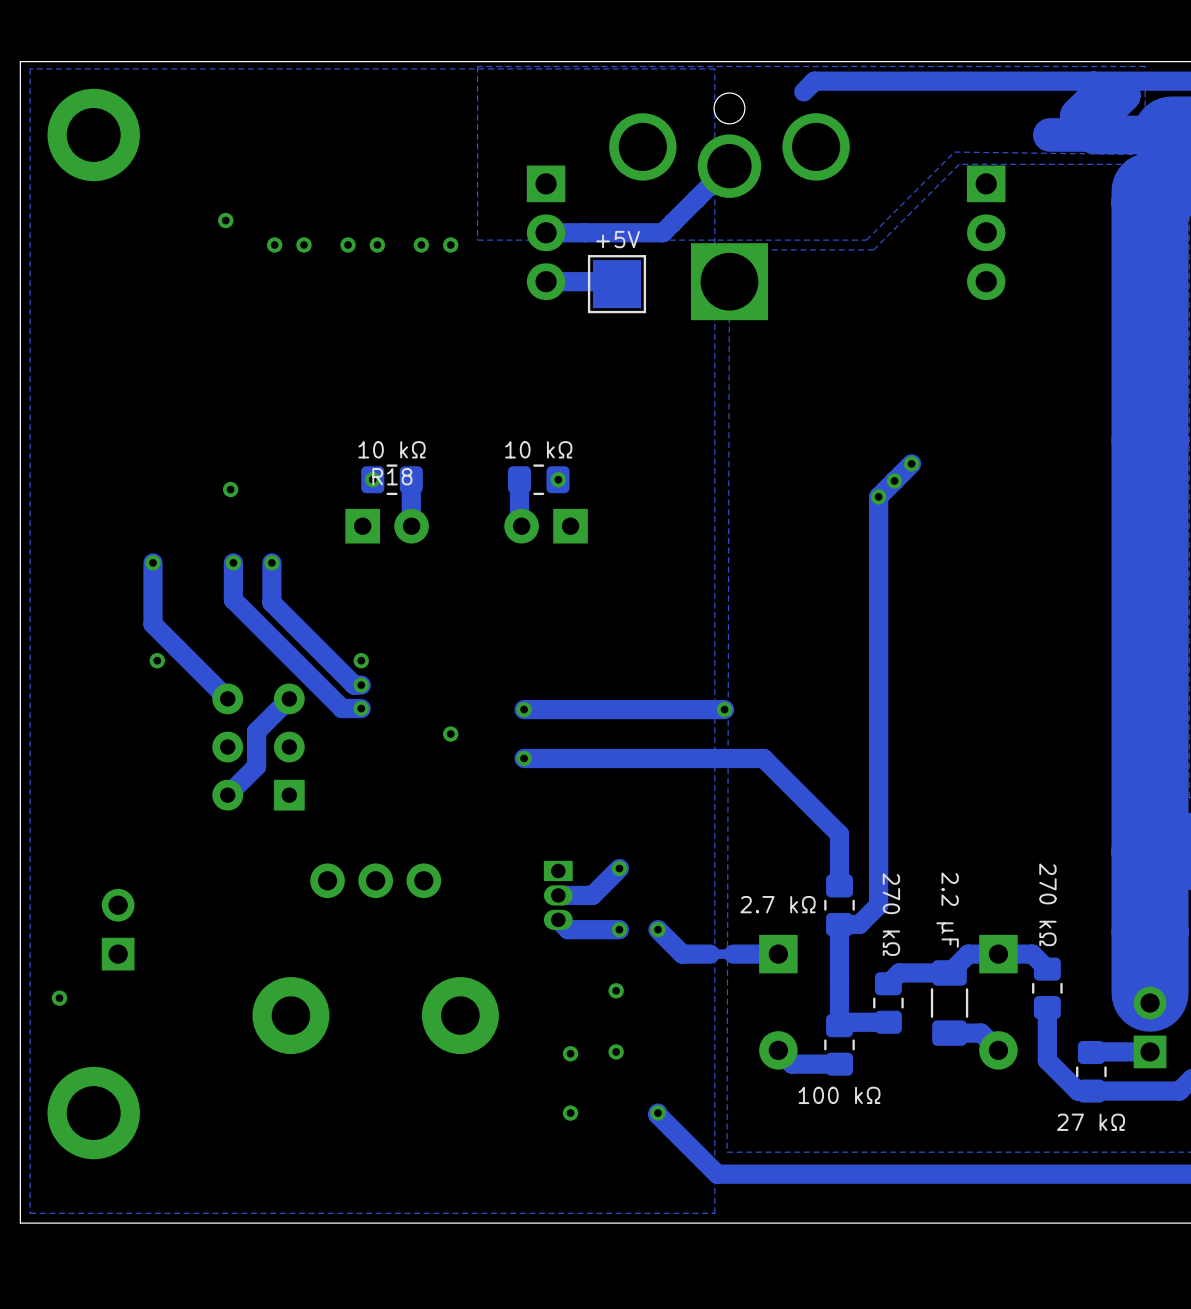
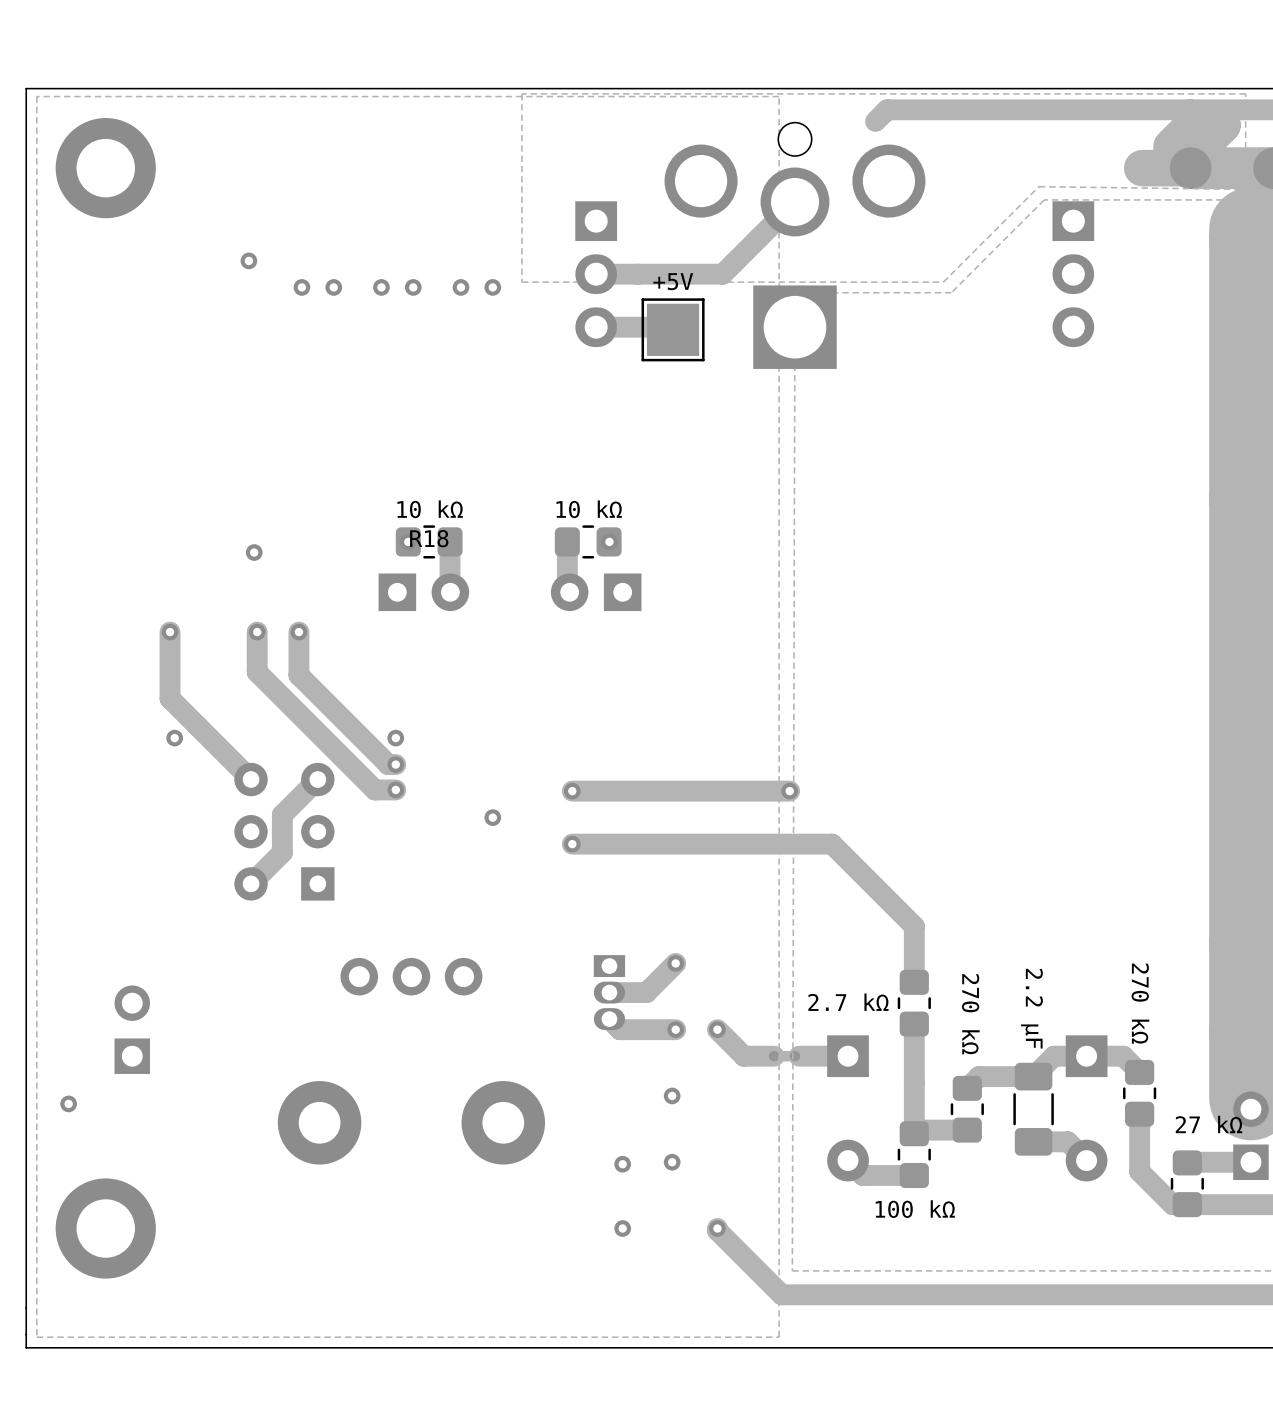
track: (911, 463) (878, 496) (878, 905) (859, 924) (839, 924) -> none
via: (911, 463) -> none
via: (894, 480) -> none
via: (878, 496) -> none
part value position: 27 kΩ (1091, 1122) -> 27 kΩ (1208, 1124)

